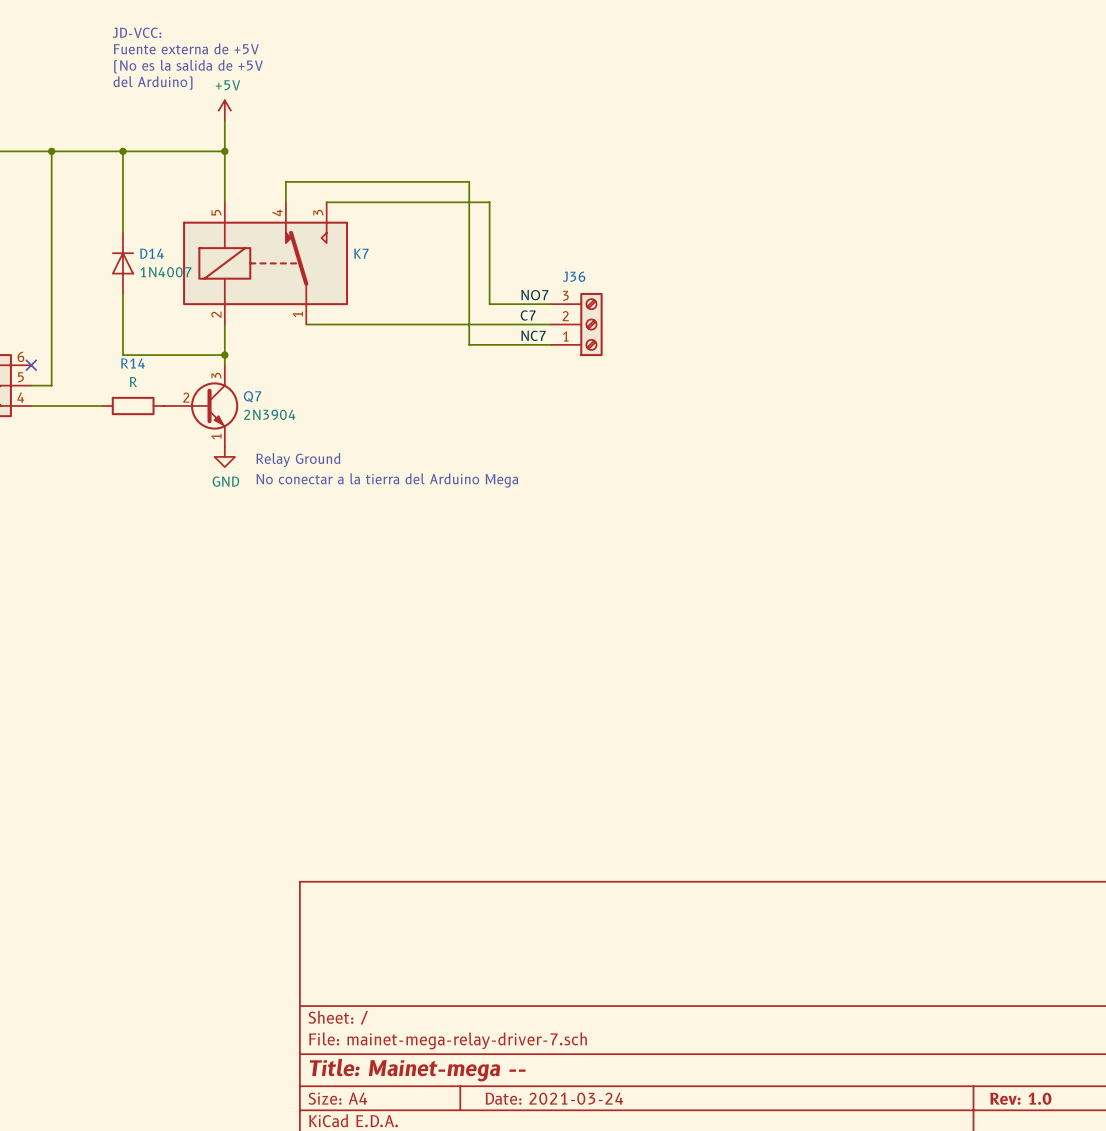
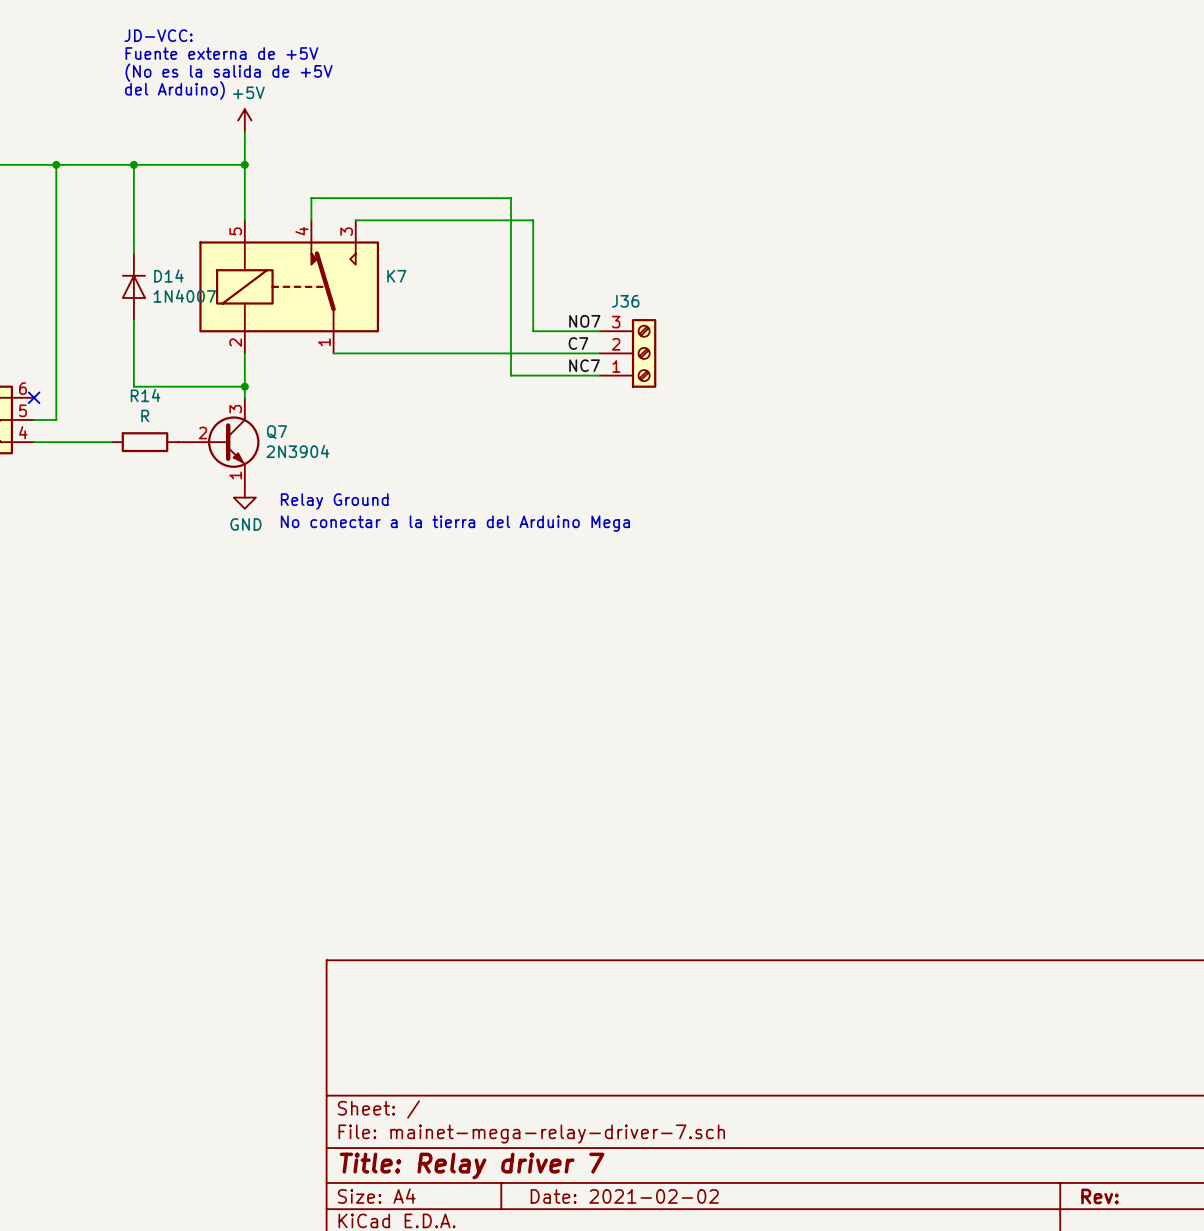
title block: Title: Mainet-mega -- (417, 1070) -> Title: Relay driver 7 (472, 1166)
title block: Date: 2021-03-24 (554, 1098) -> Date: 2021-02-02 (624, 1196)
title block: Rev: 1.0 (1020, 1098) -> Rev: (1099, 1196)

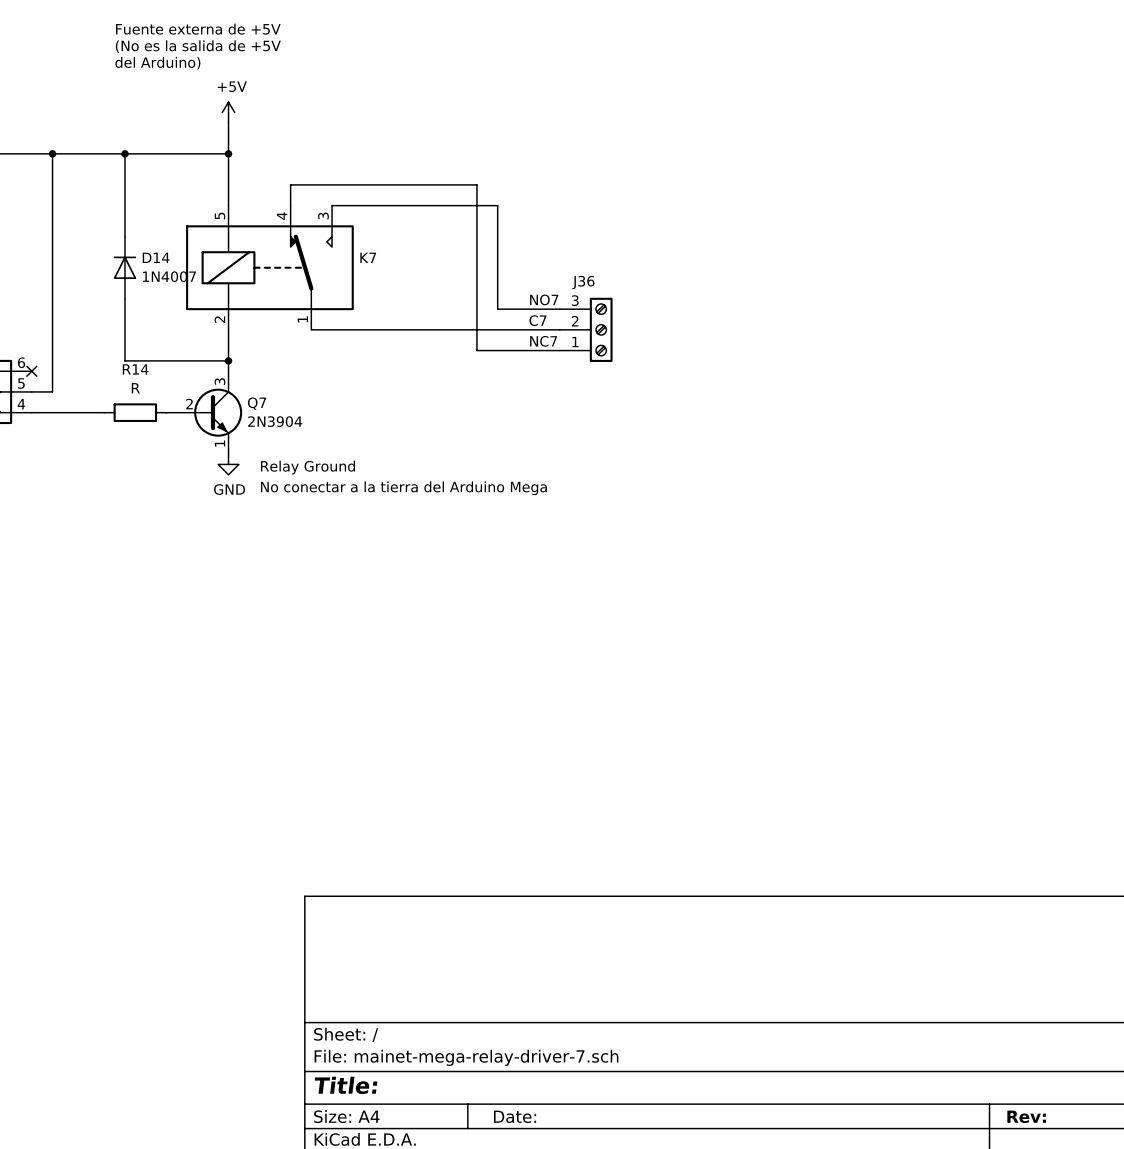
text: JD-VCC: (158, 35) -> Fuente externa de +5V (198, 29)
text: Fuente externa de +5V (221, 53) -> (No es la salida de +5V (198, 46)
text: (No es la salida de +5V (229, 72) -> del Arduino) (157, 63)
text: del Arduino) (174, 90) -> none
title block: Title: Relay driver 7 (472, 1166) -> Title: (346, 1085)
title block: Date: 2021-02-02 (624, 1196) -> Date: (515, 1116)

